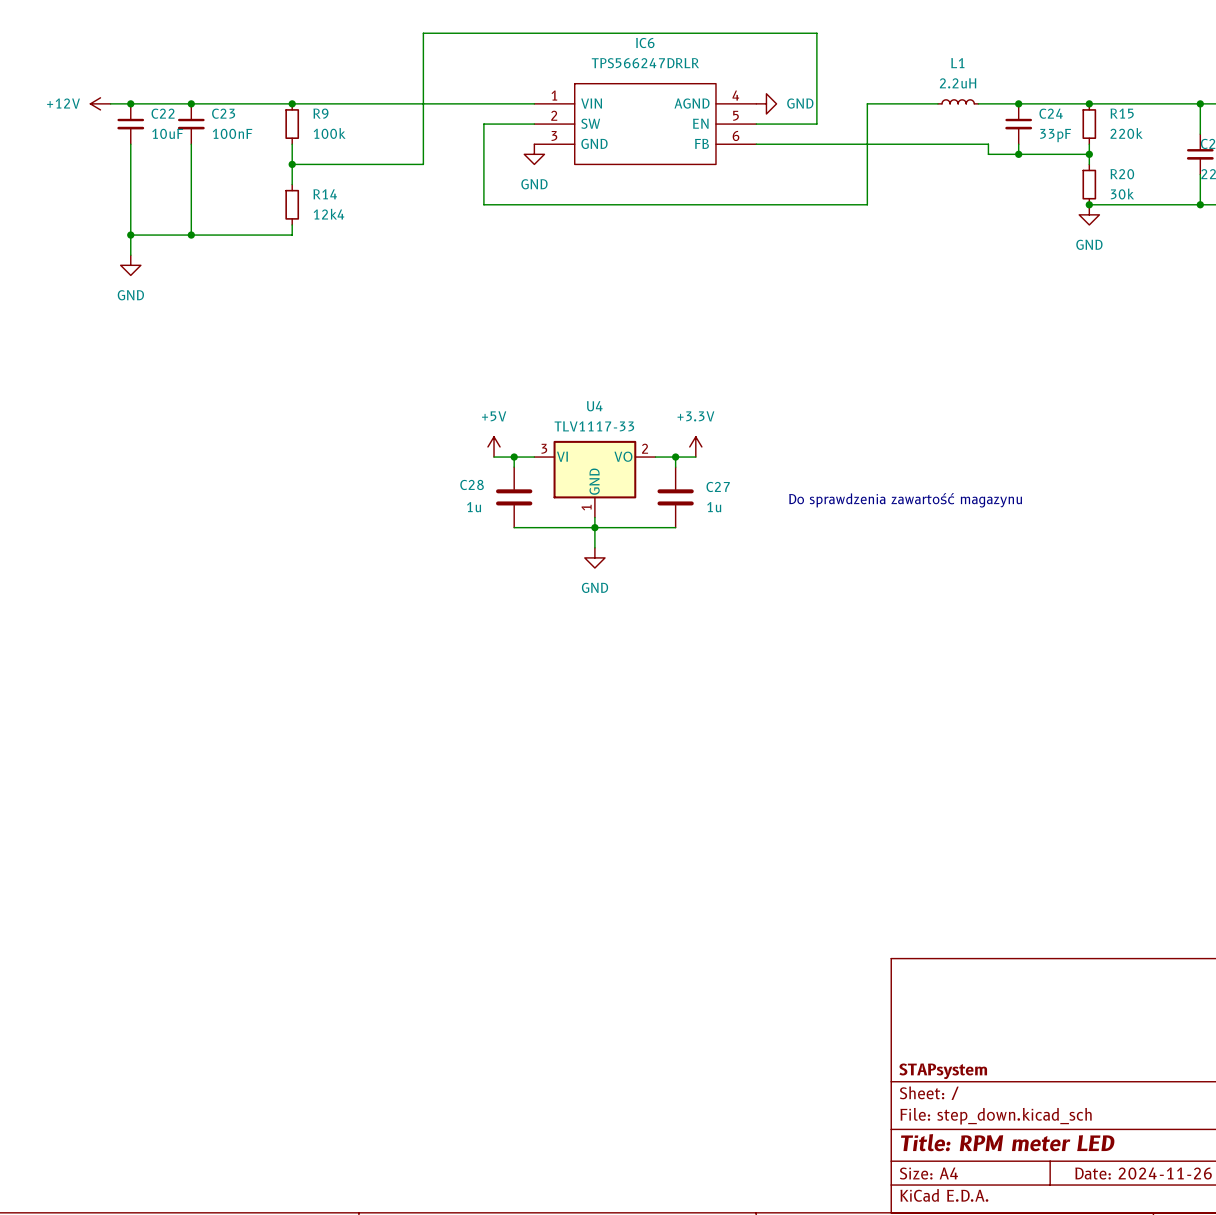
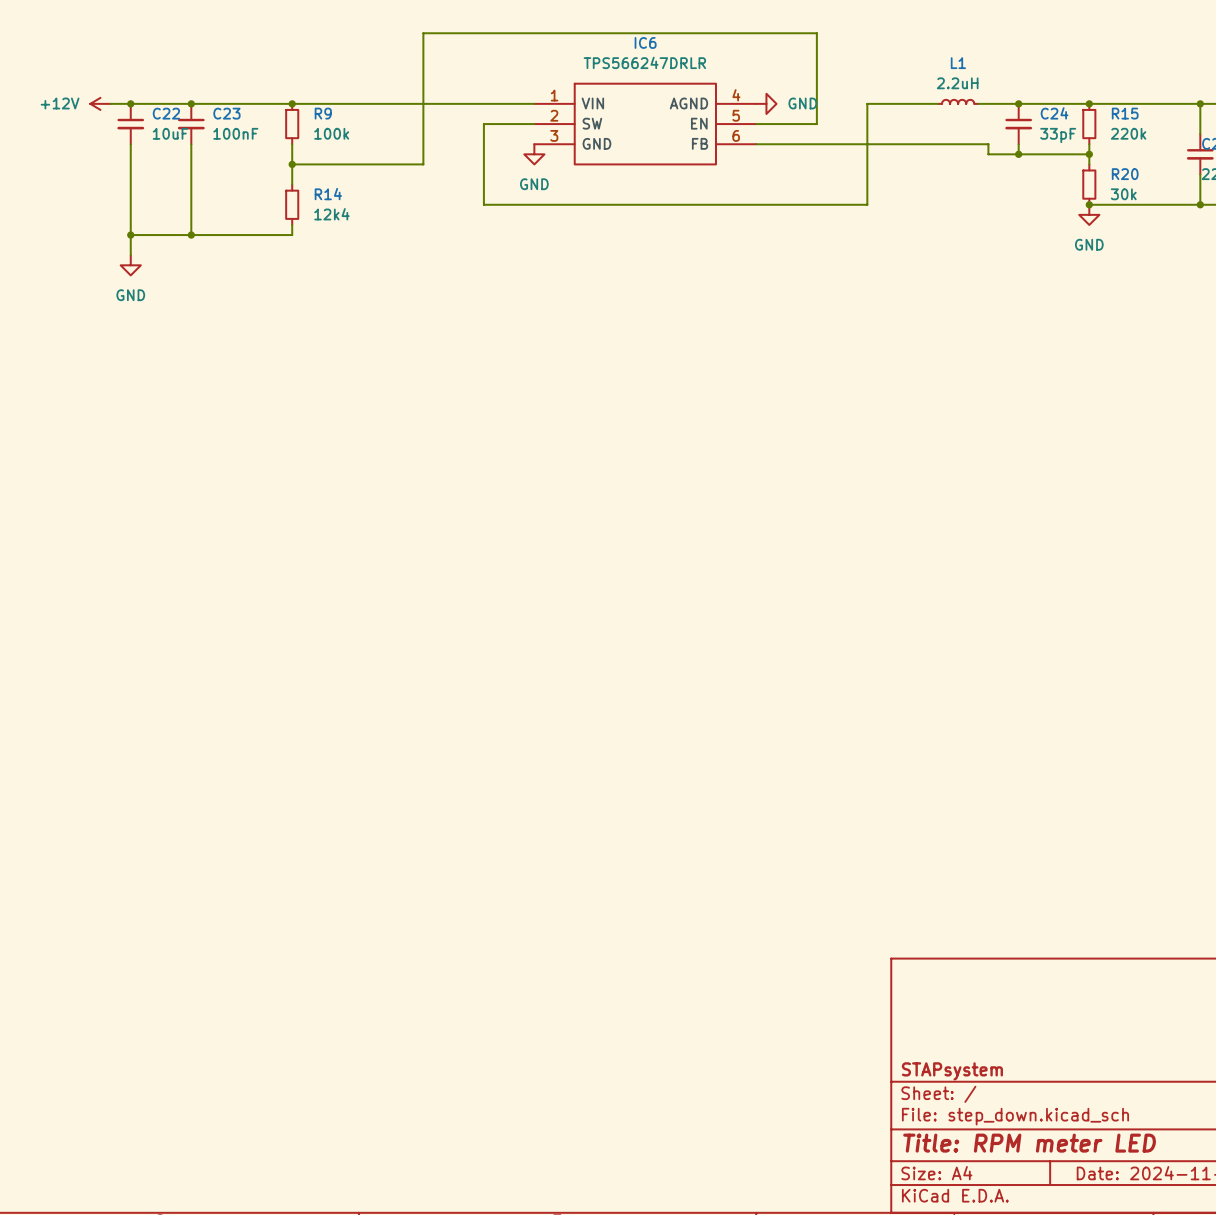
power symbol: +5V (494, 446) -> none
power symbol: +3.3V (695, 446) -> none
wire: (494, 457) (534, 457) -> none
wire: (514, 457) (514, 467) -> none
junction: (514, 457) -> none
wire: (655, 457) (695, 457) -> none
wire: (675, 457) (675, 467) -> none
junction: (675, 457) -> none
U4: TLV1117-33 (594, 479) -> none
C28: 1u (514, 497) -> none
C27: 1u (675, 497) -> none
text: Do sprawdzenia zawartość magazynu (905, 500) -> none
wire: (594, 517) (594, 547) -> none
wire: (514, 527) (675, 527) -> none
junction: (594, 527) -> none
power symbol: GND (594, 557) -> none

